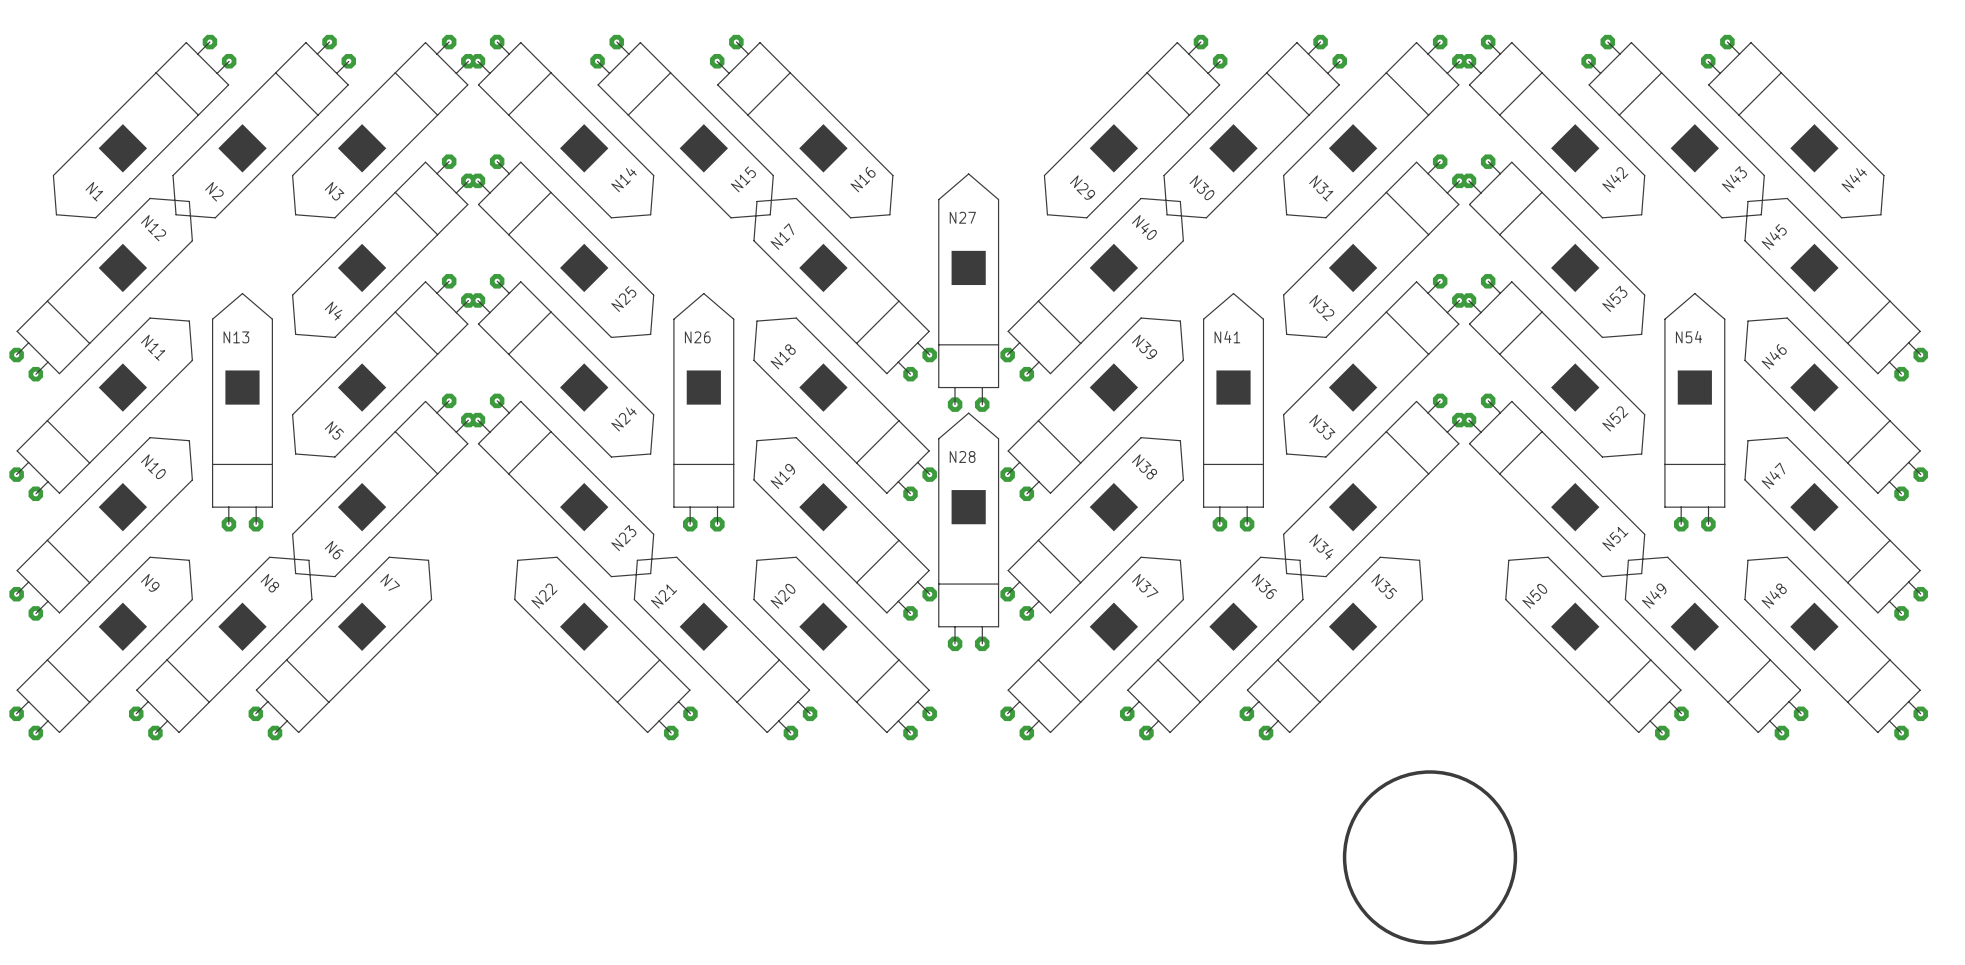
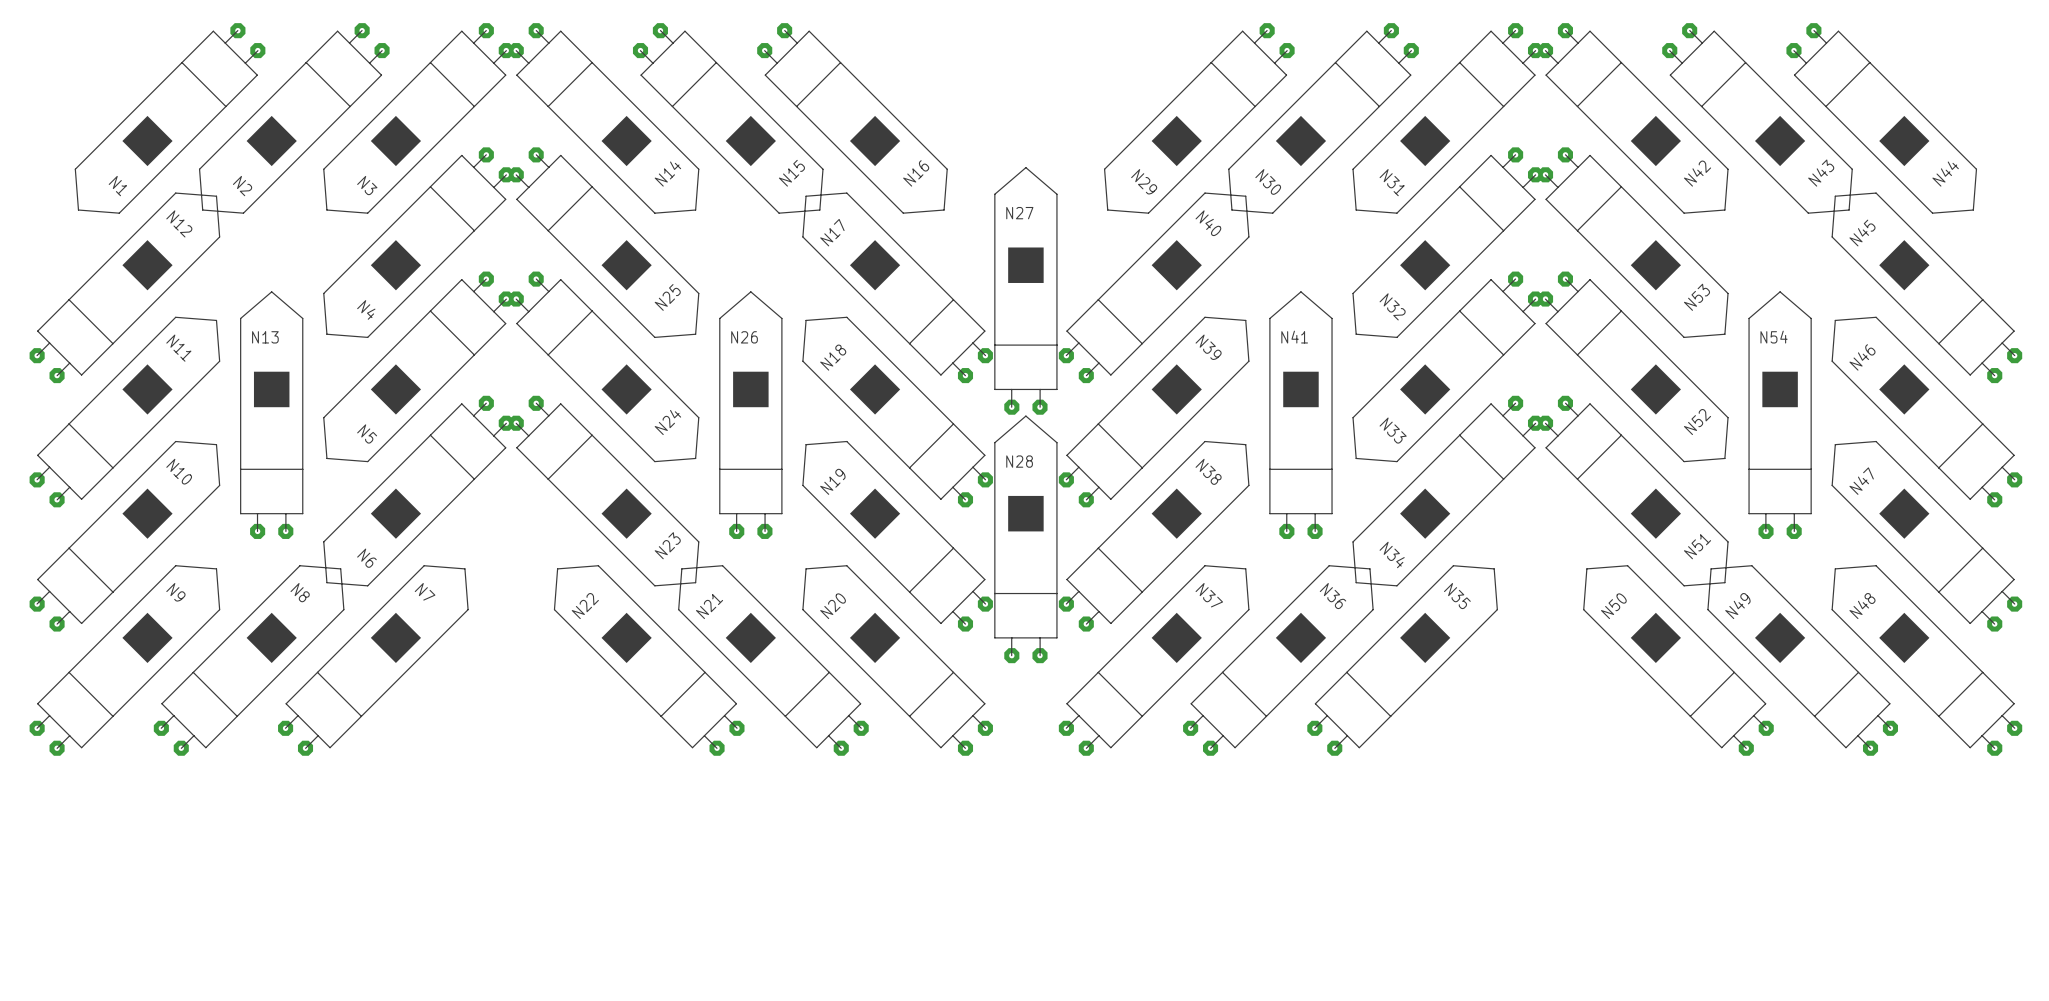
drawing: [1342, 770, 1518, 945] -> none

